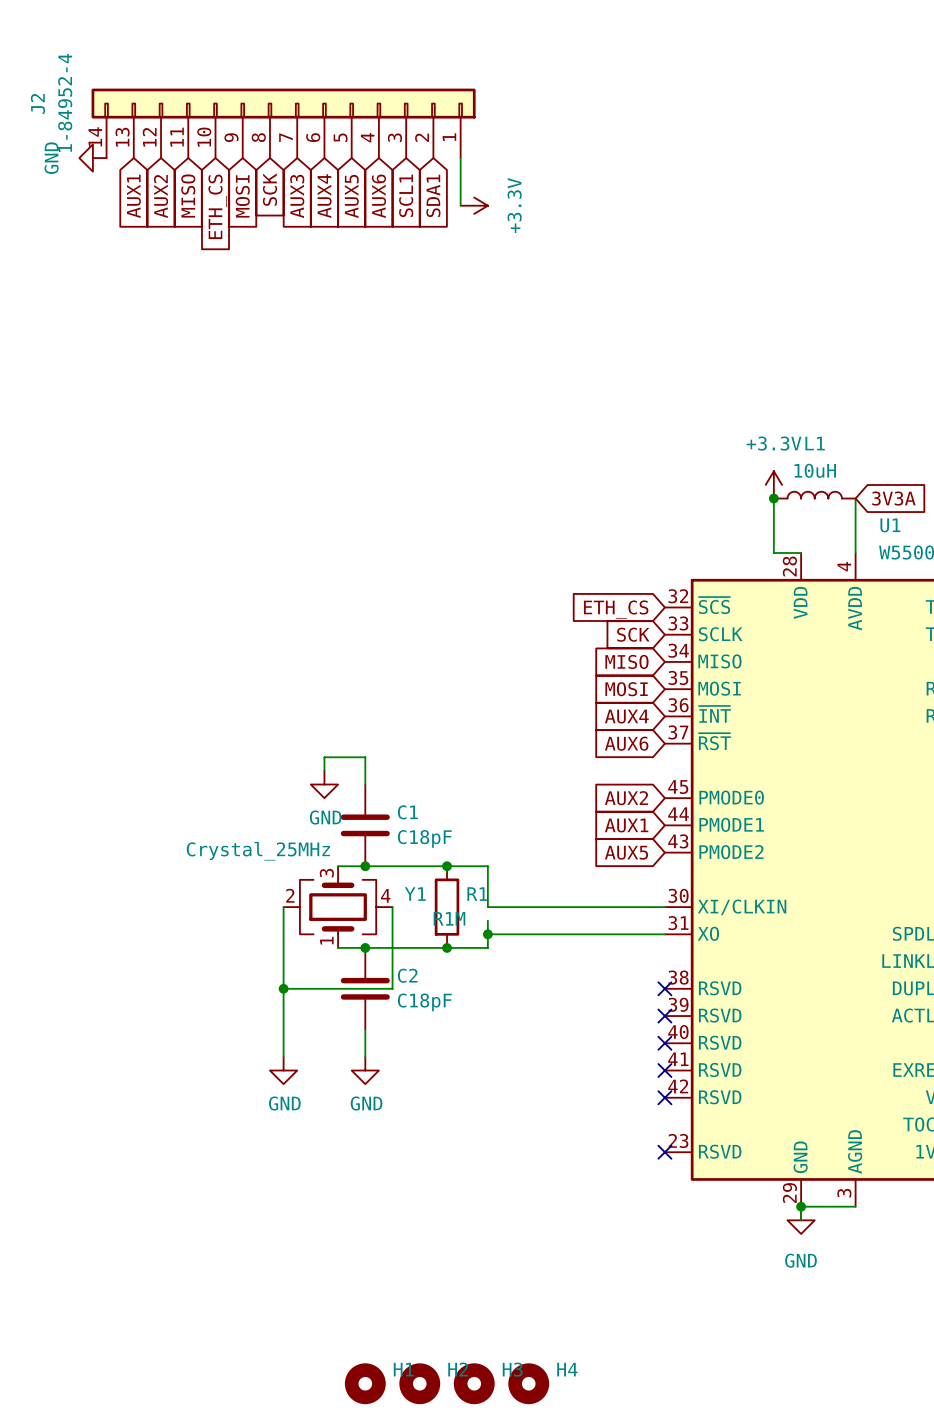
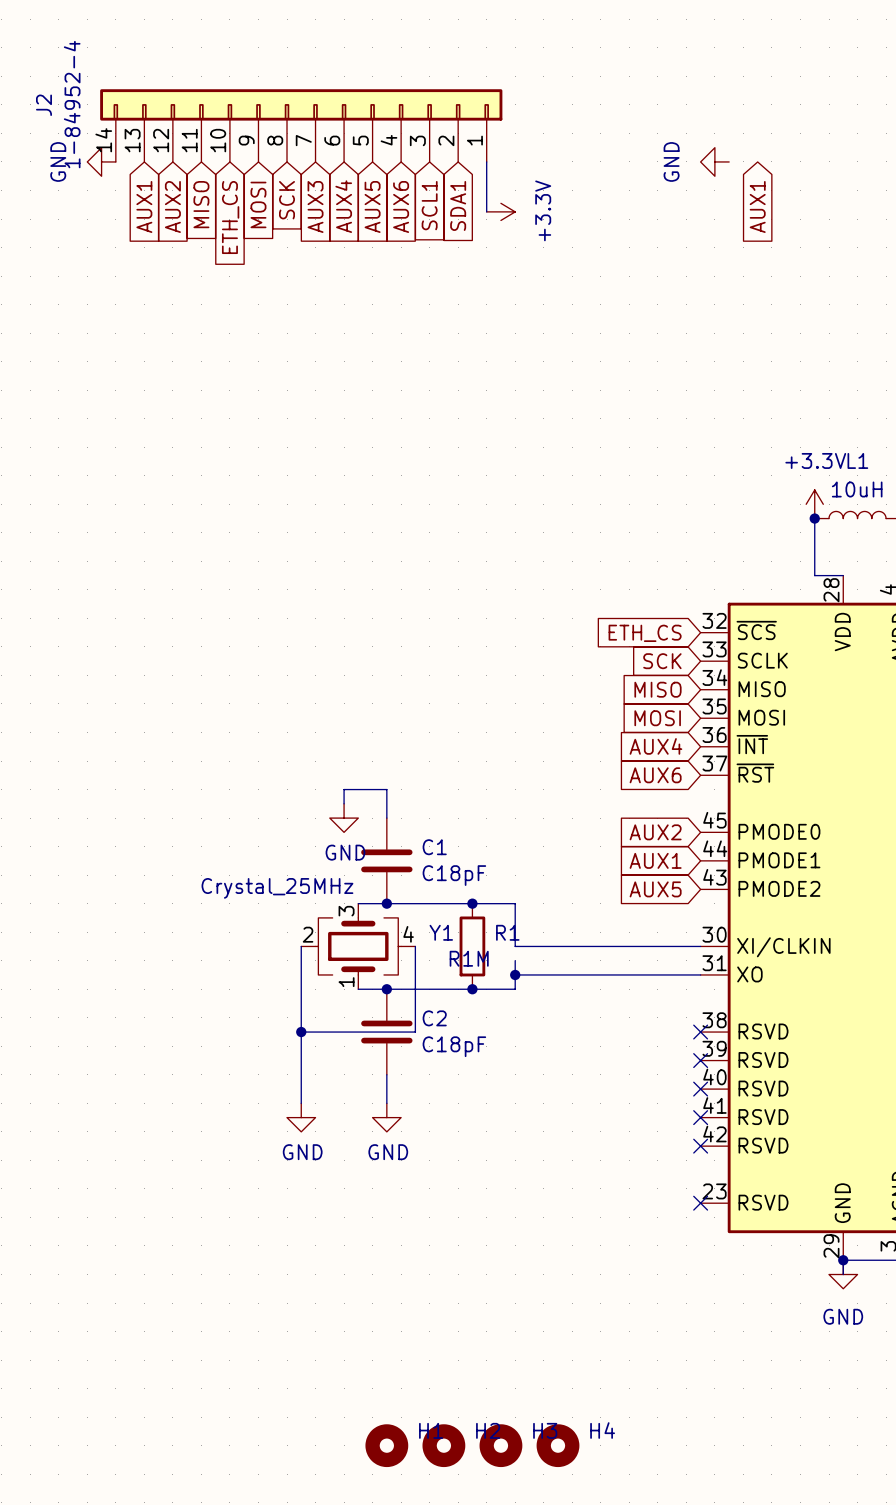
power symbol: none -> GND (714, 161)
global label: none -> AUX1 (757, 206)

